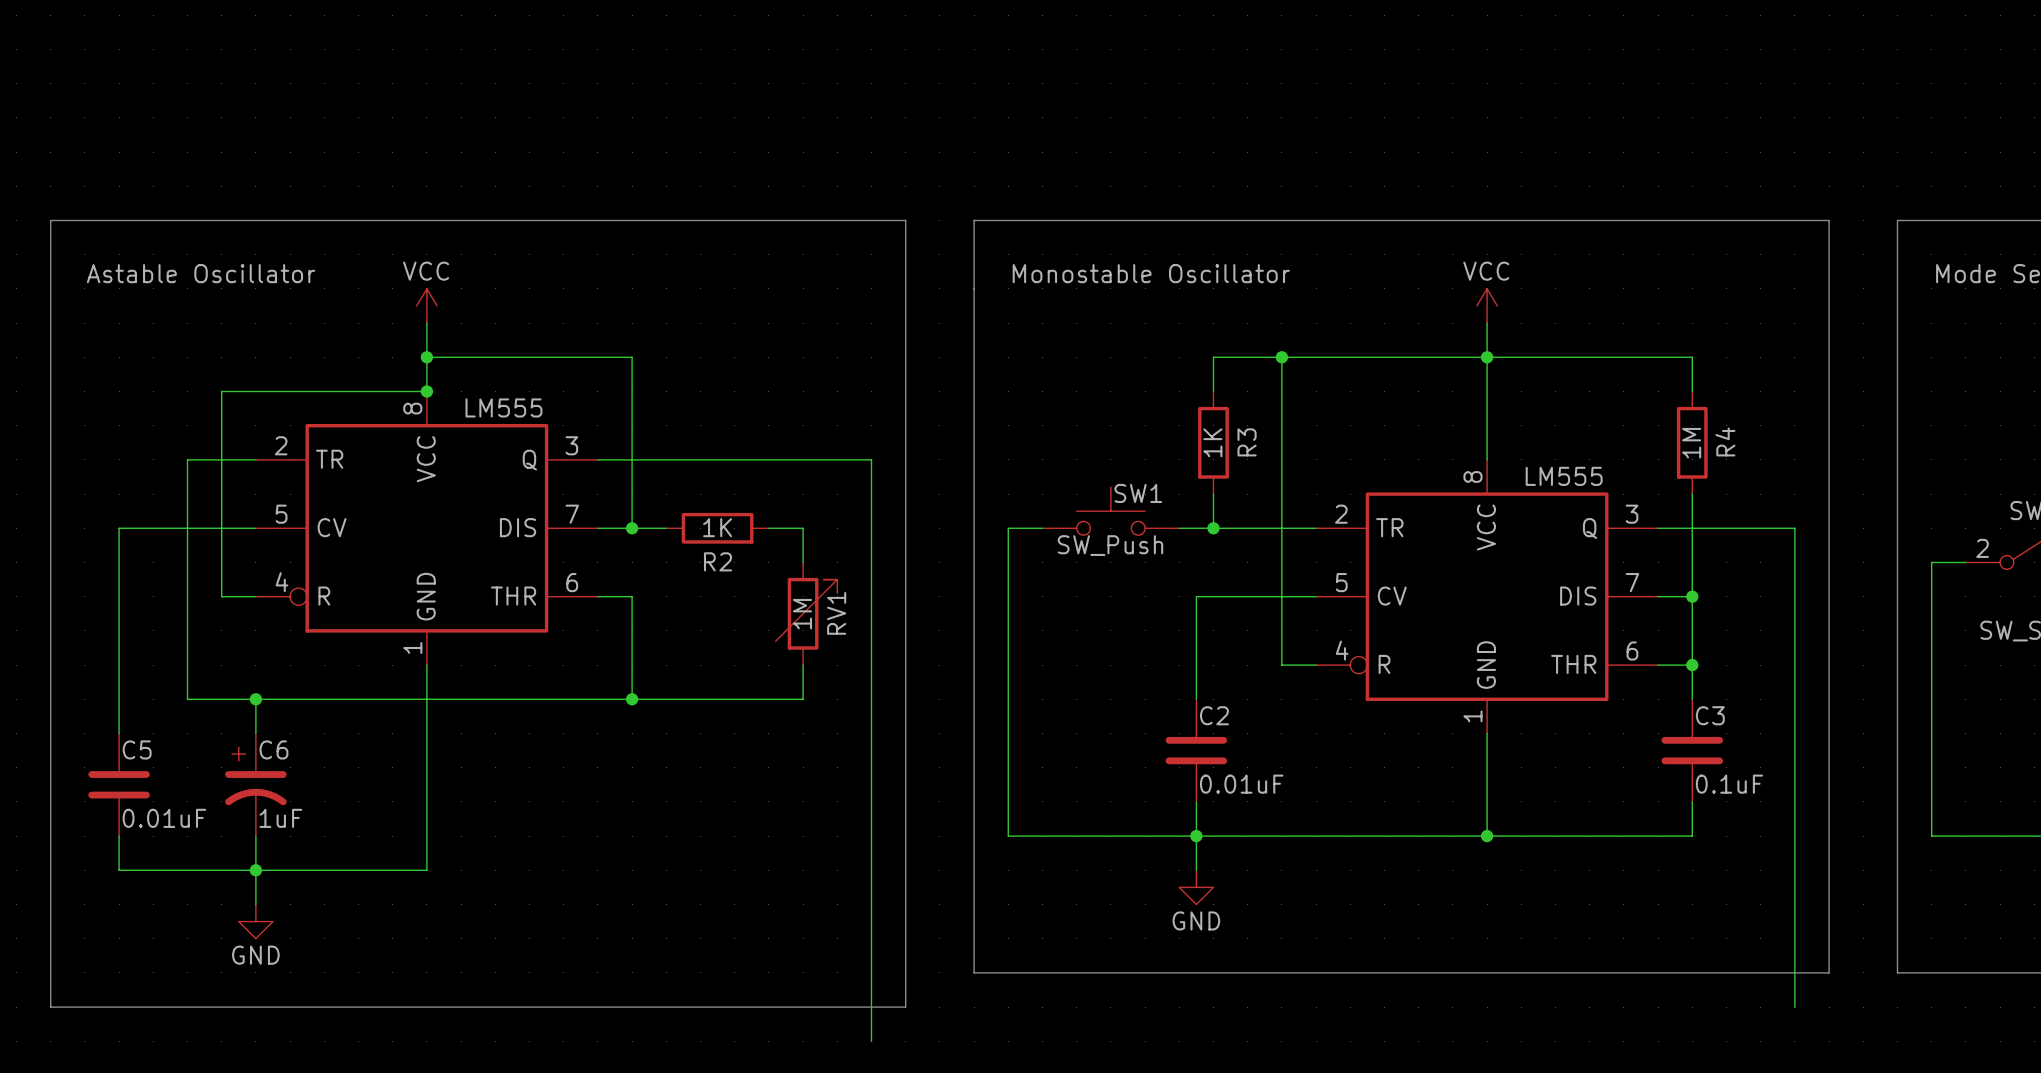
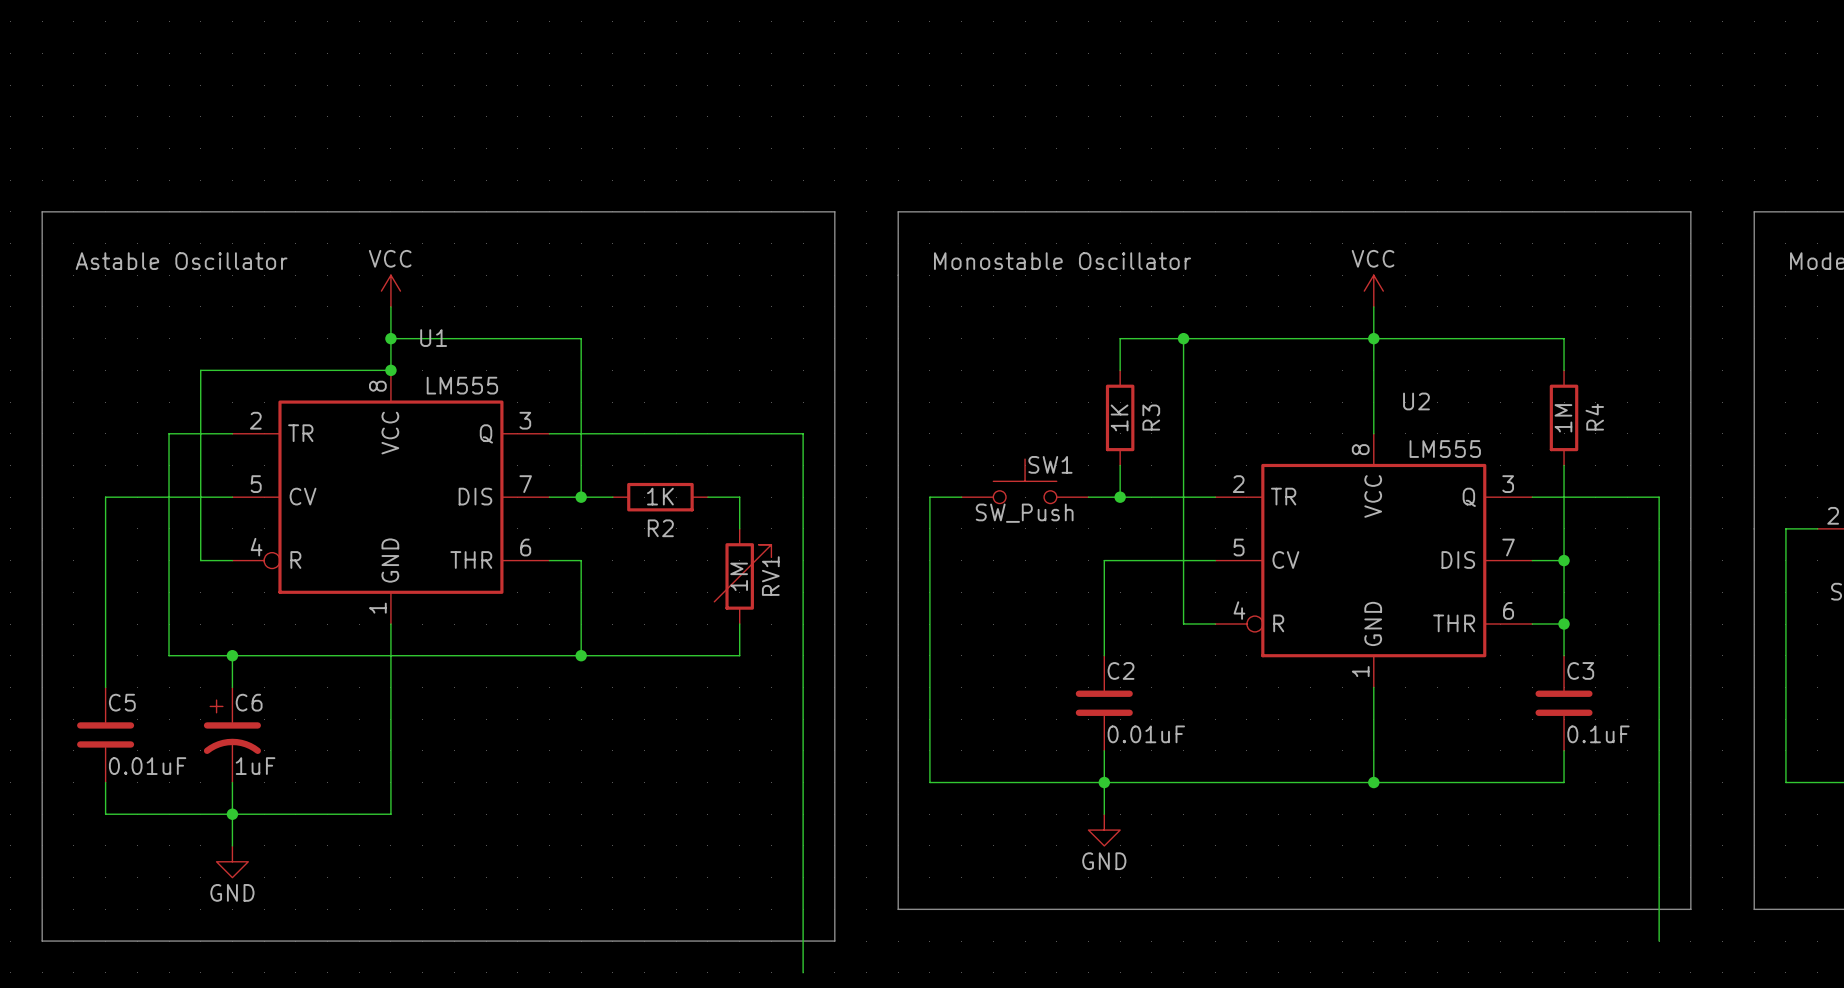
U1 name: none -> U1 (433, 338)
U2 name: none -> U2 (1416, 401)

